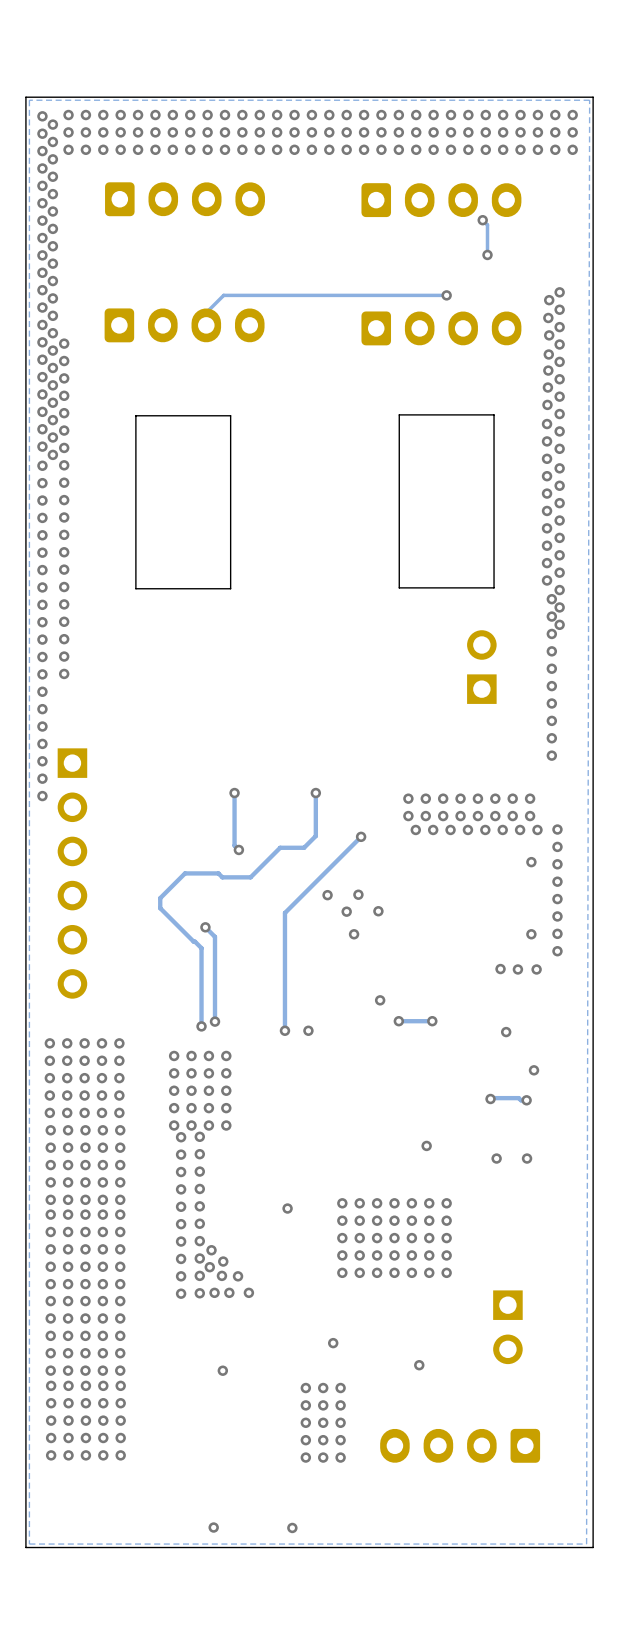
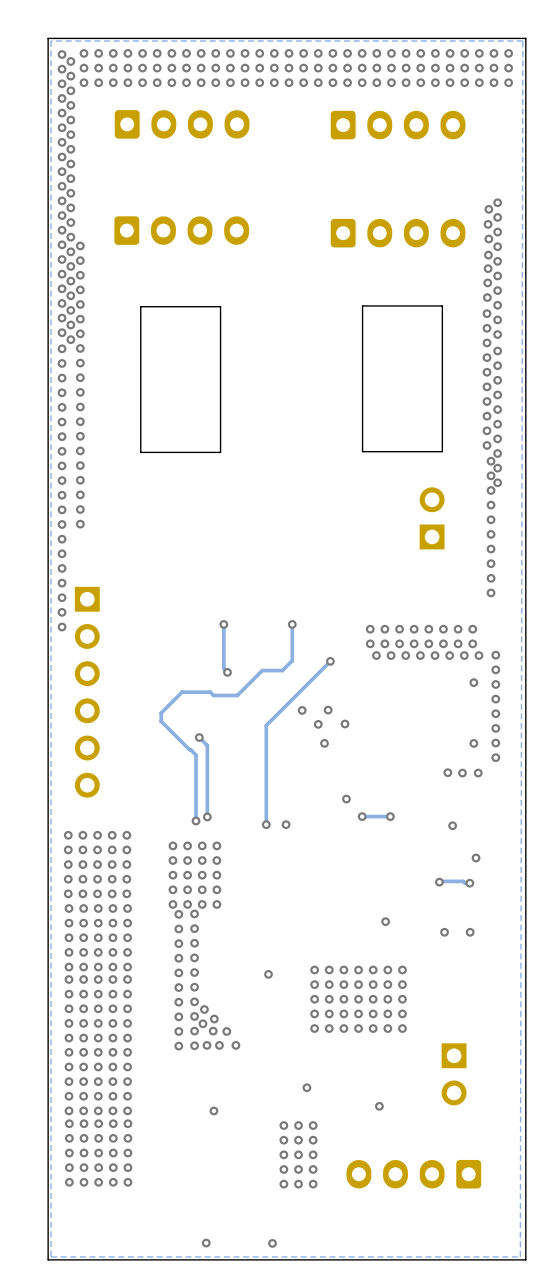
track: (482, 220) (487, 224) (487, 254) -> none
via: (482, 220) -> none
via: (487, 254) -> none
track: (446, 295) (223, 295) (206, 312) (206, 325) -> none
via: (446, 295) -> none

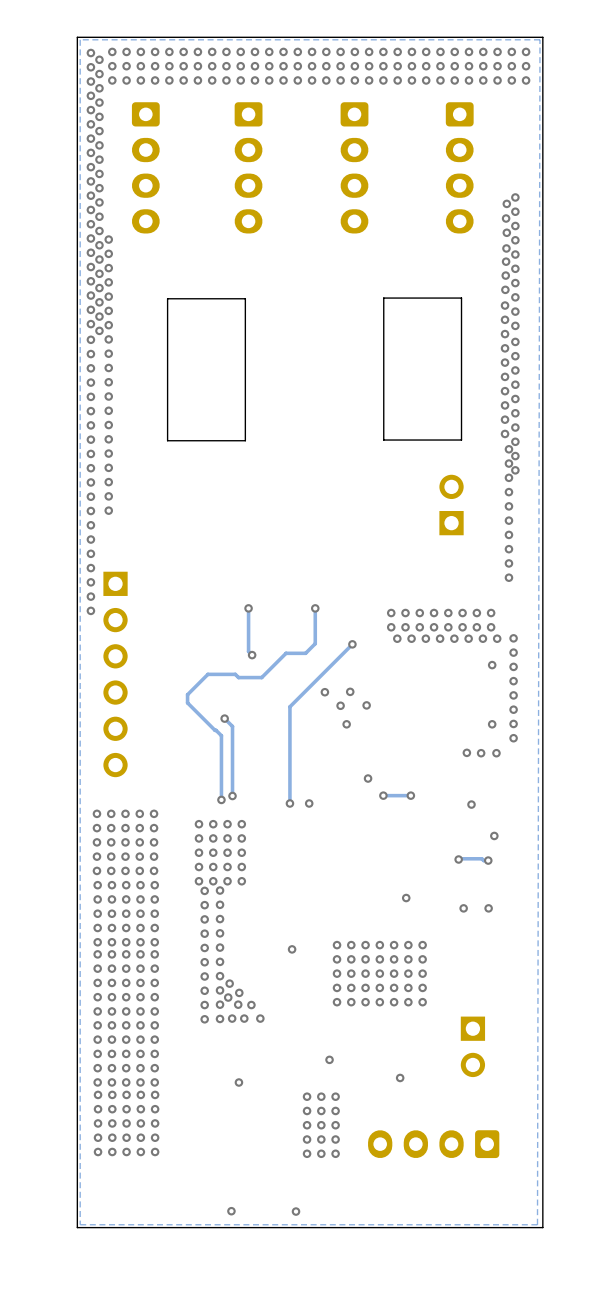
part: (182, 124) -> none
part: (398, 125) -> none
part: none -> (145, 167)
part: none -> (248, 167)
part: none -> (354, 167)
part: none -> (459, 167)
part: (181, 230) -> none
part: (398, 233) -> none

